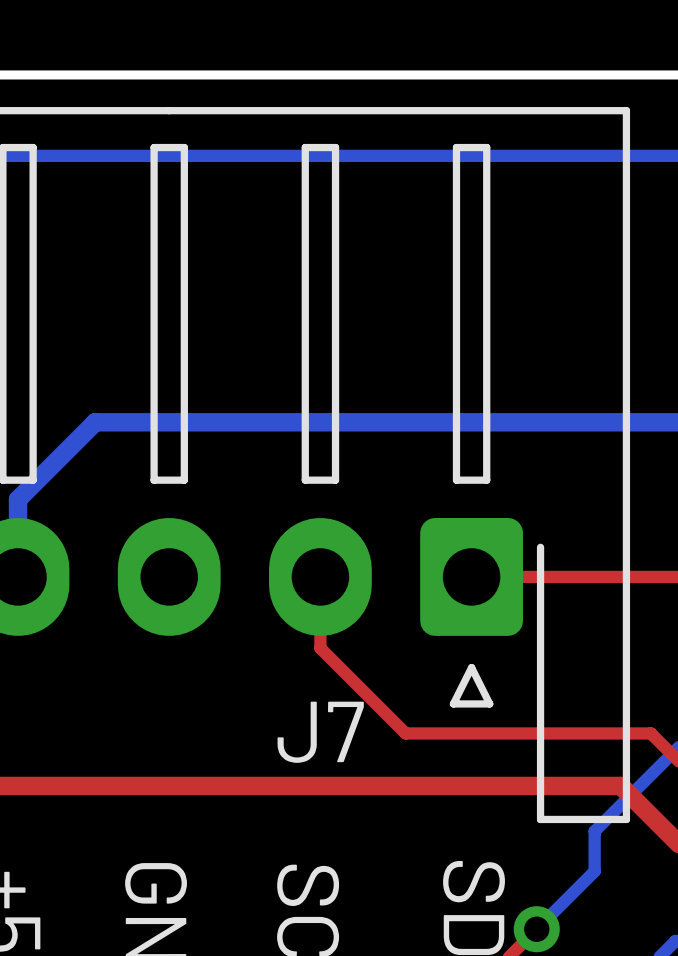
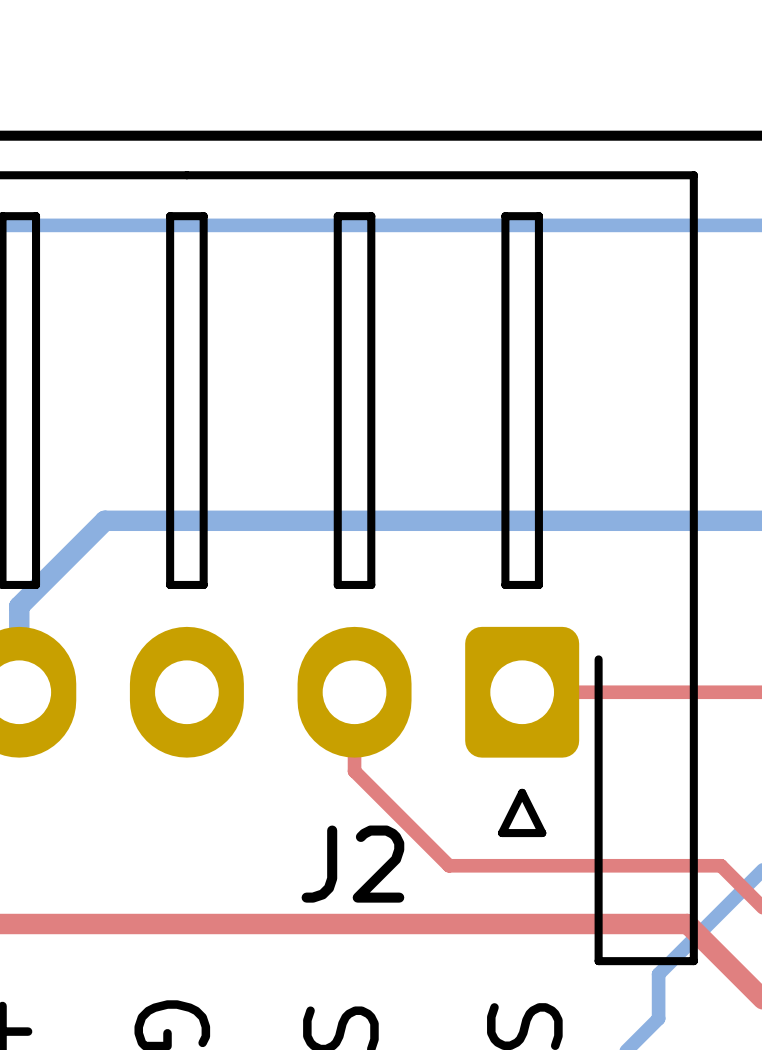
J7 name: J7 (320, 732) -> J2 (352, 864)

